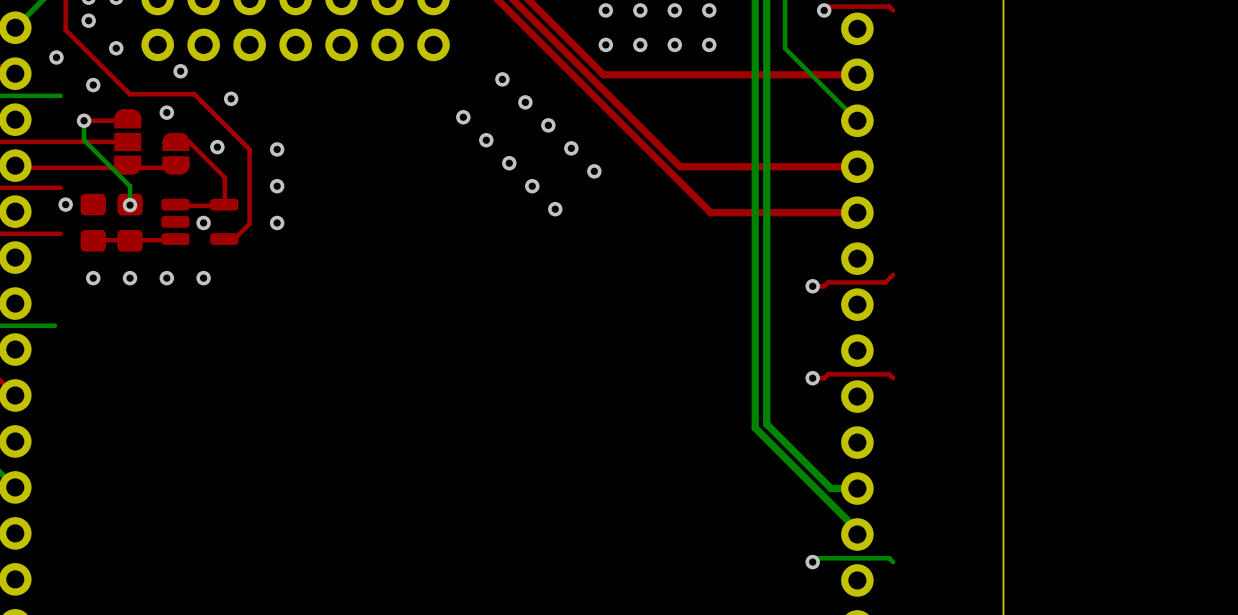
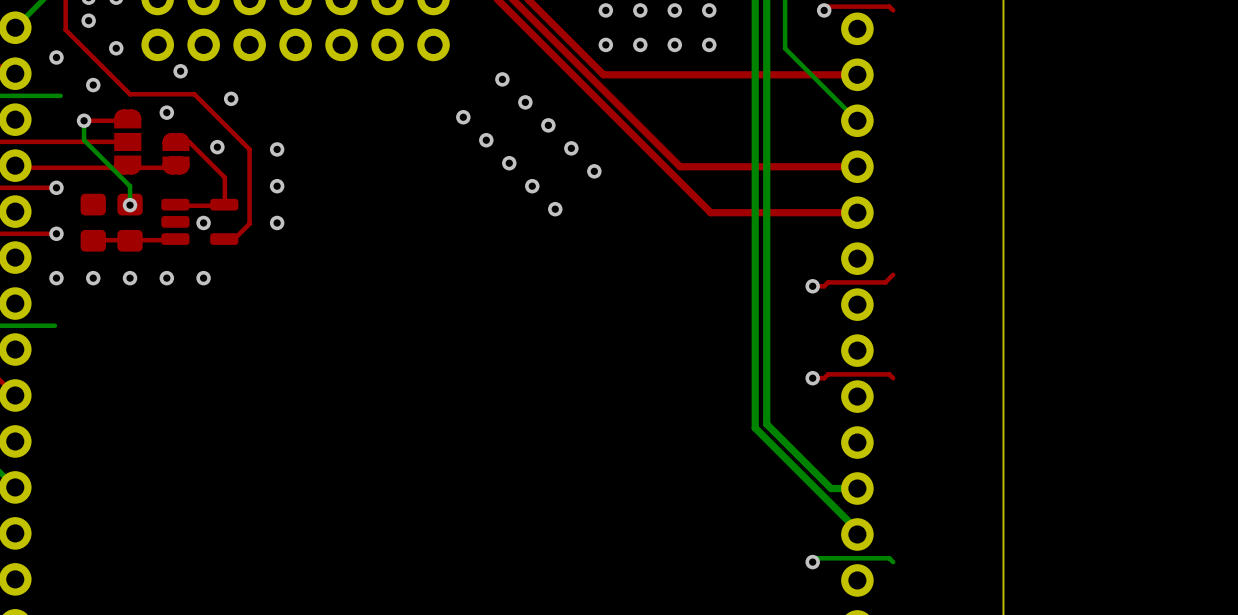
via: none -> (56, 187)
via: (65, 204) -> none
via: none -> (56, 233)
via: none -> (56, 278)

